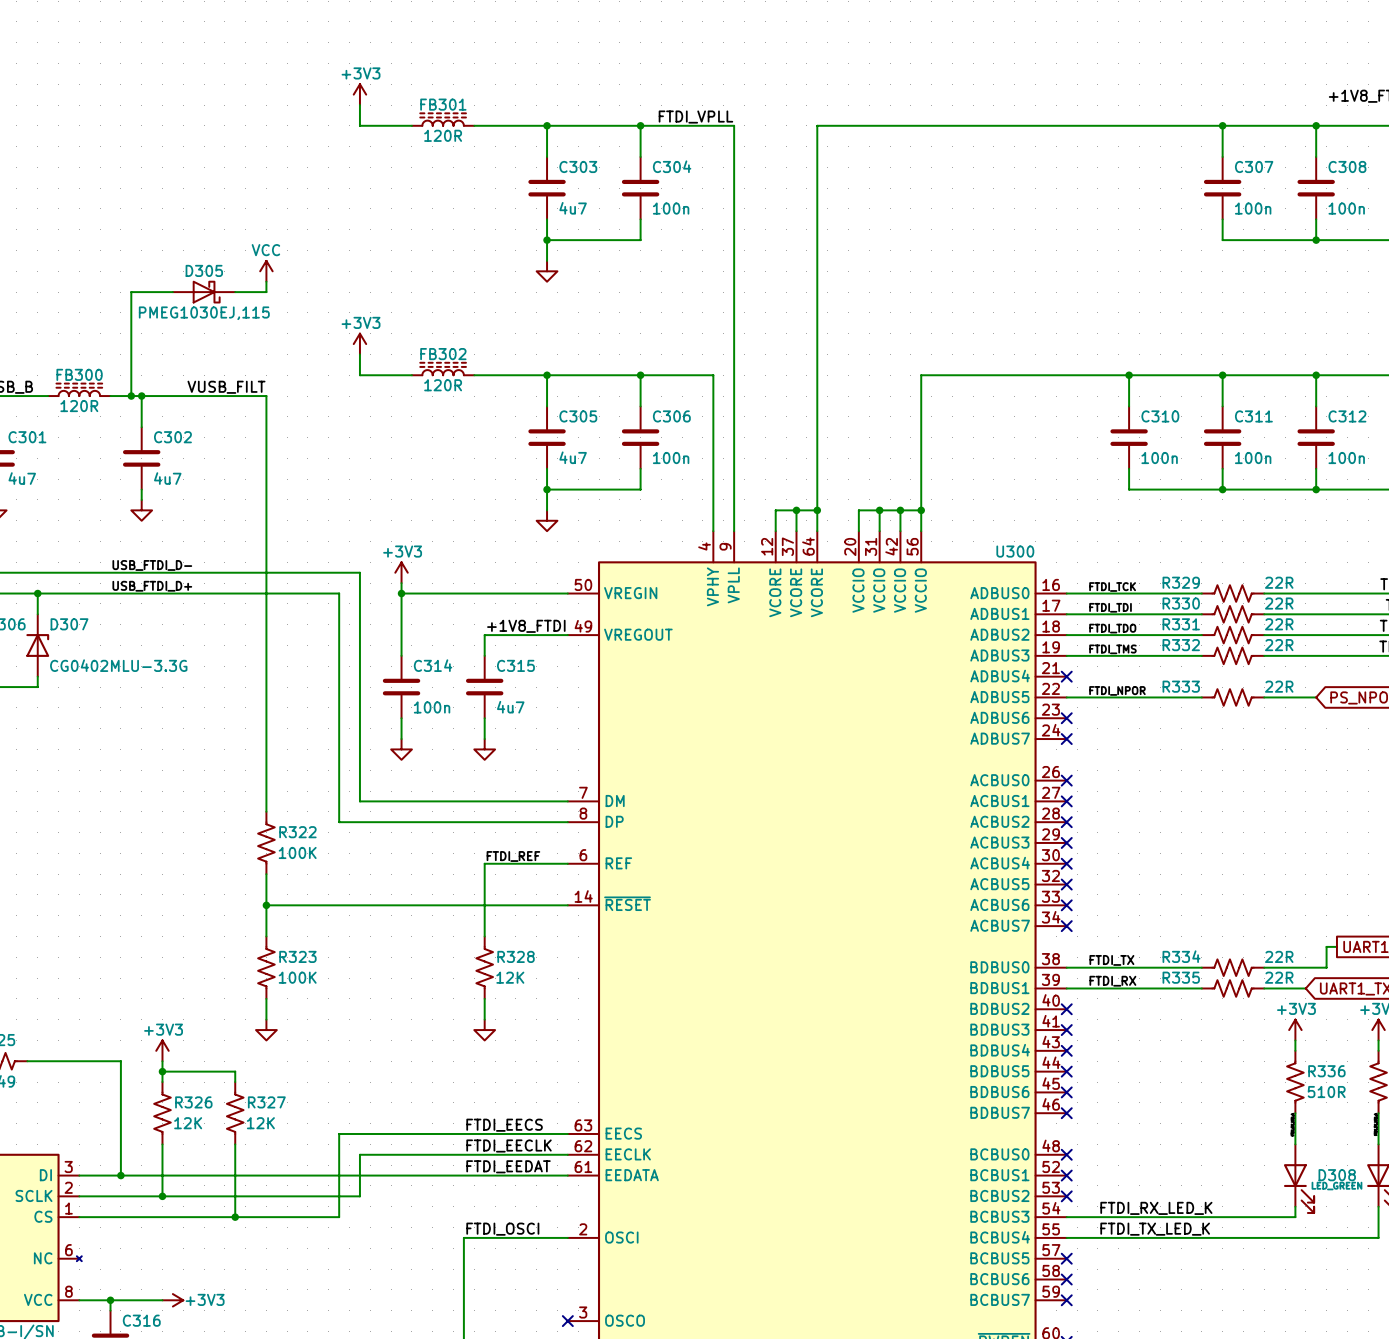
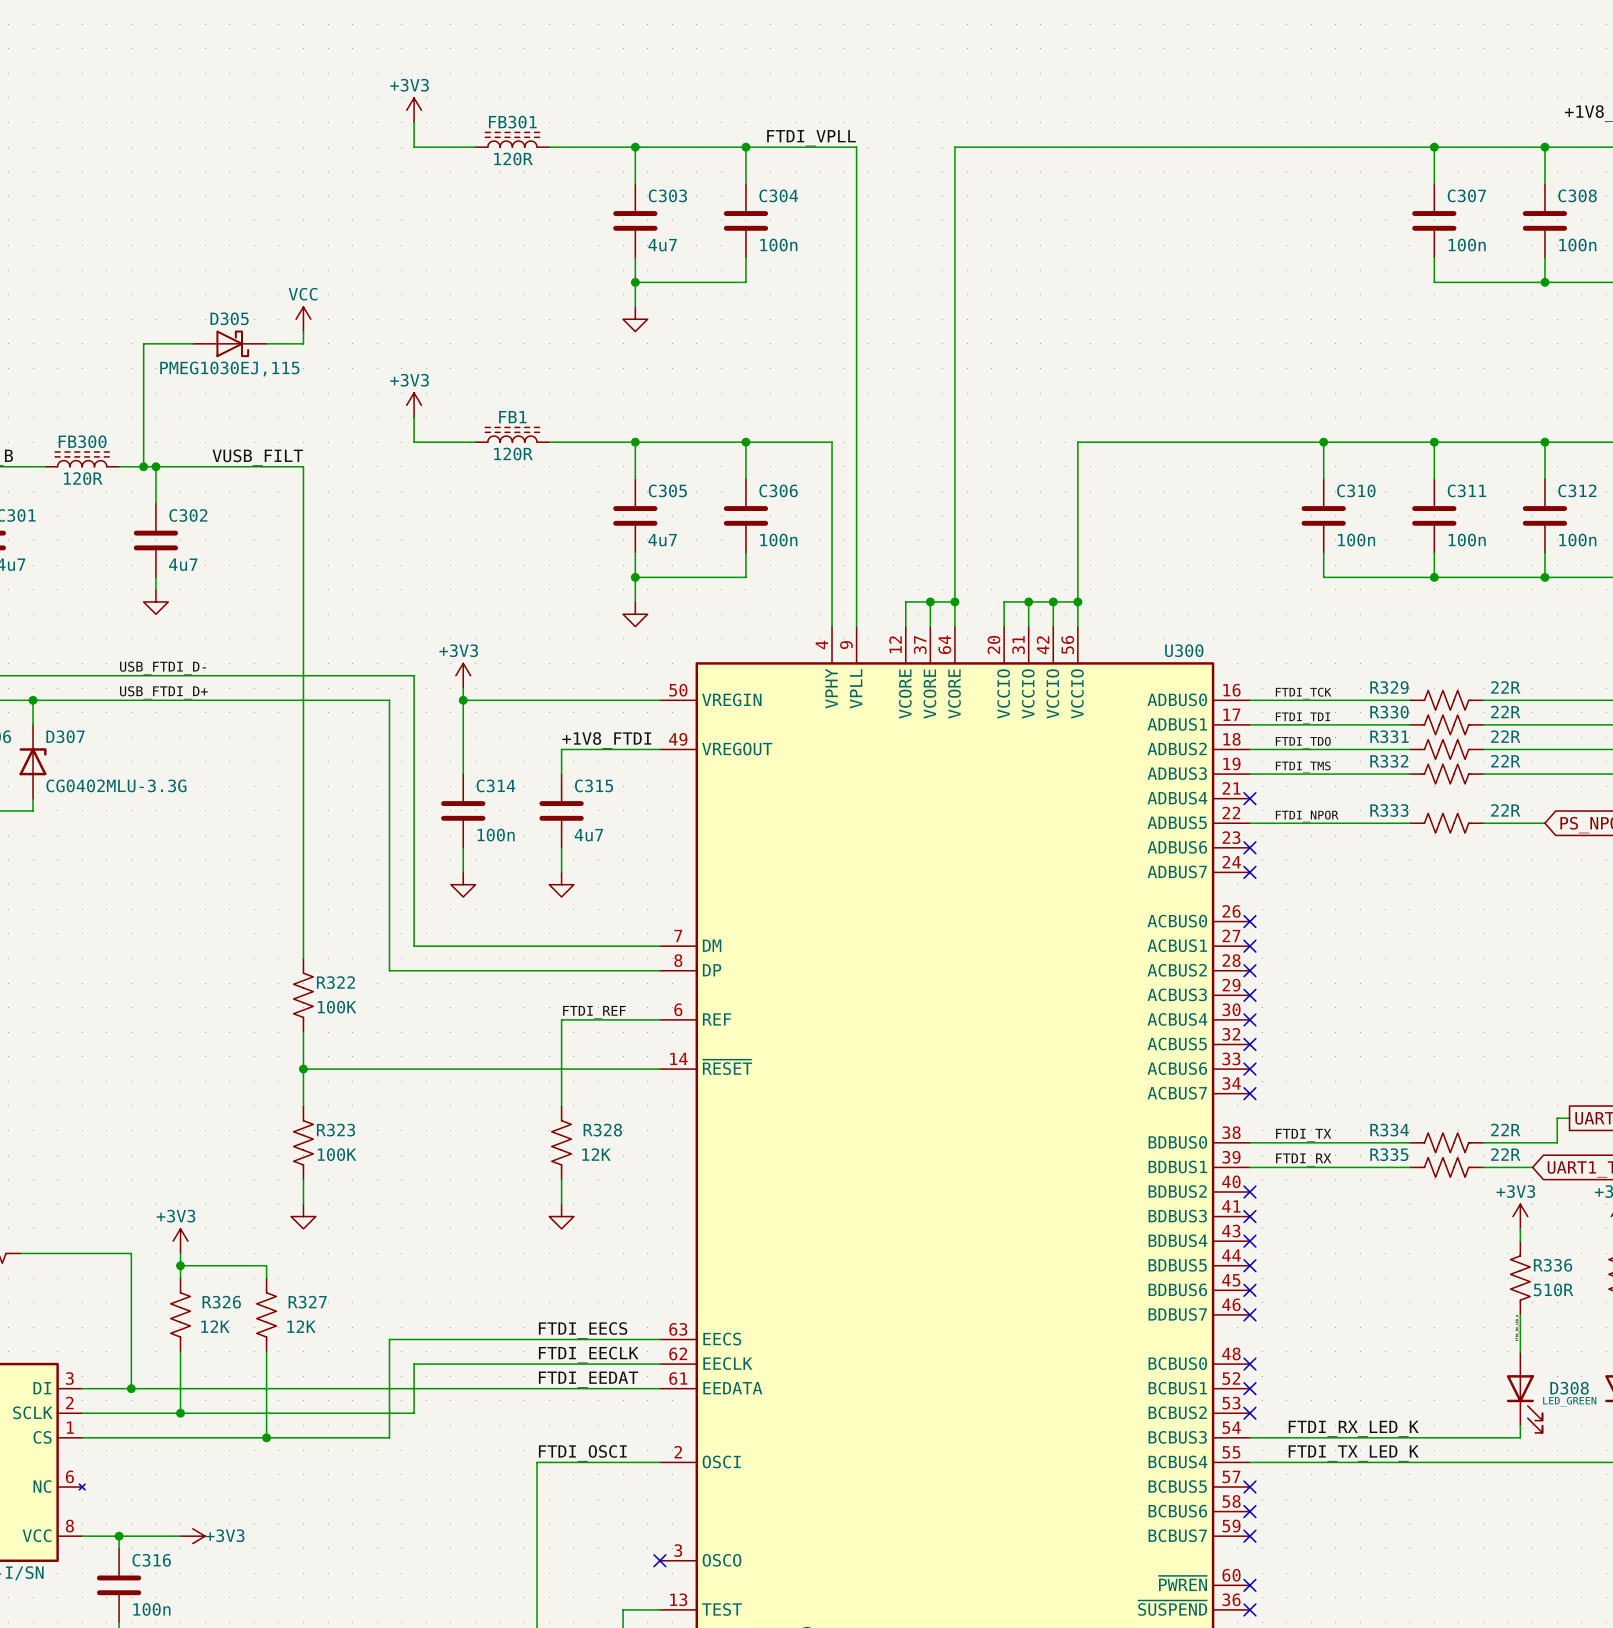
FB302 name: FB302 (443, 354) -> FB1 (512, 417)

